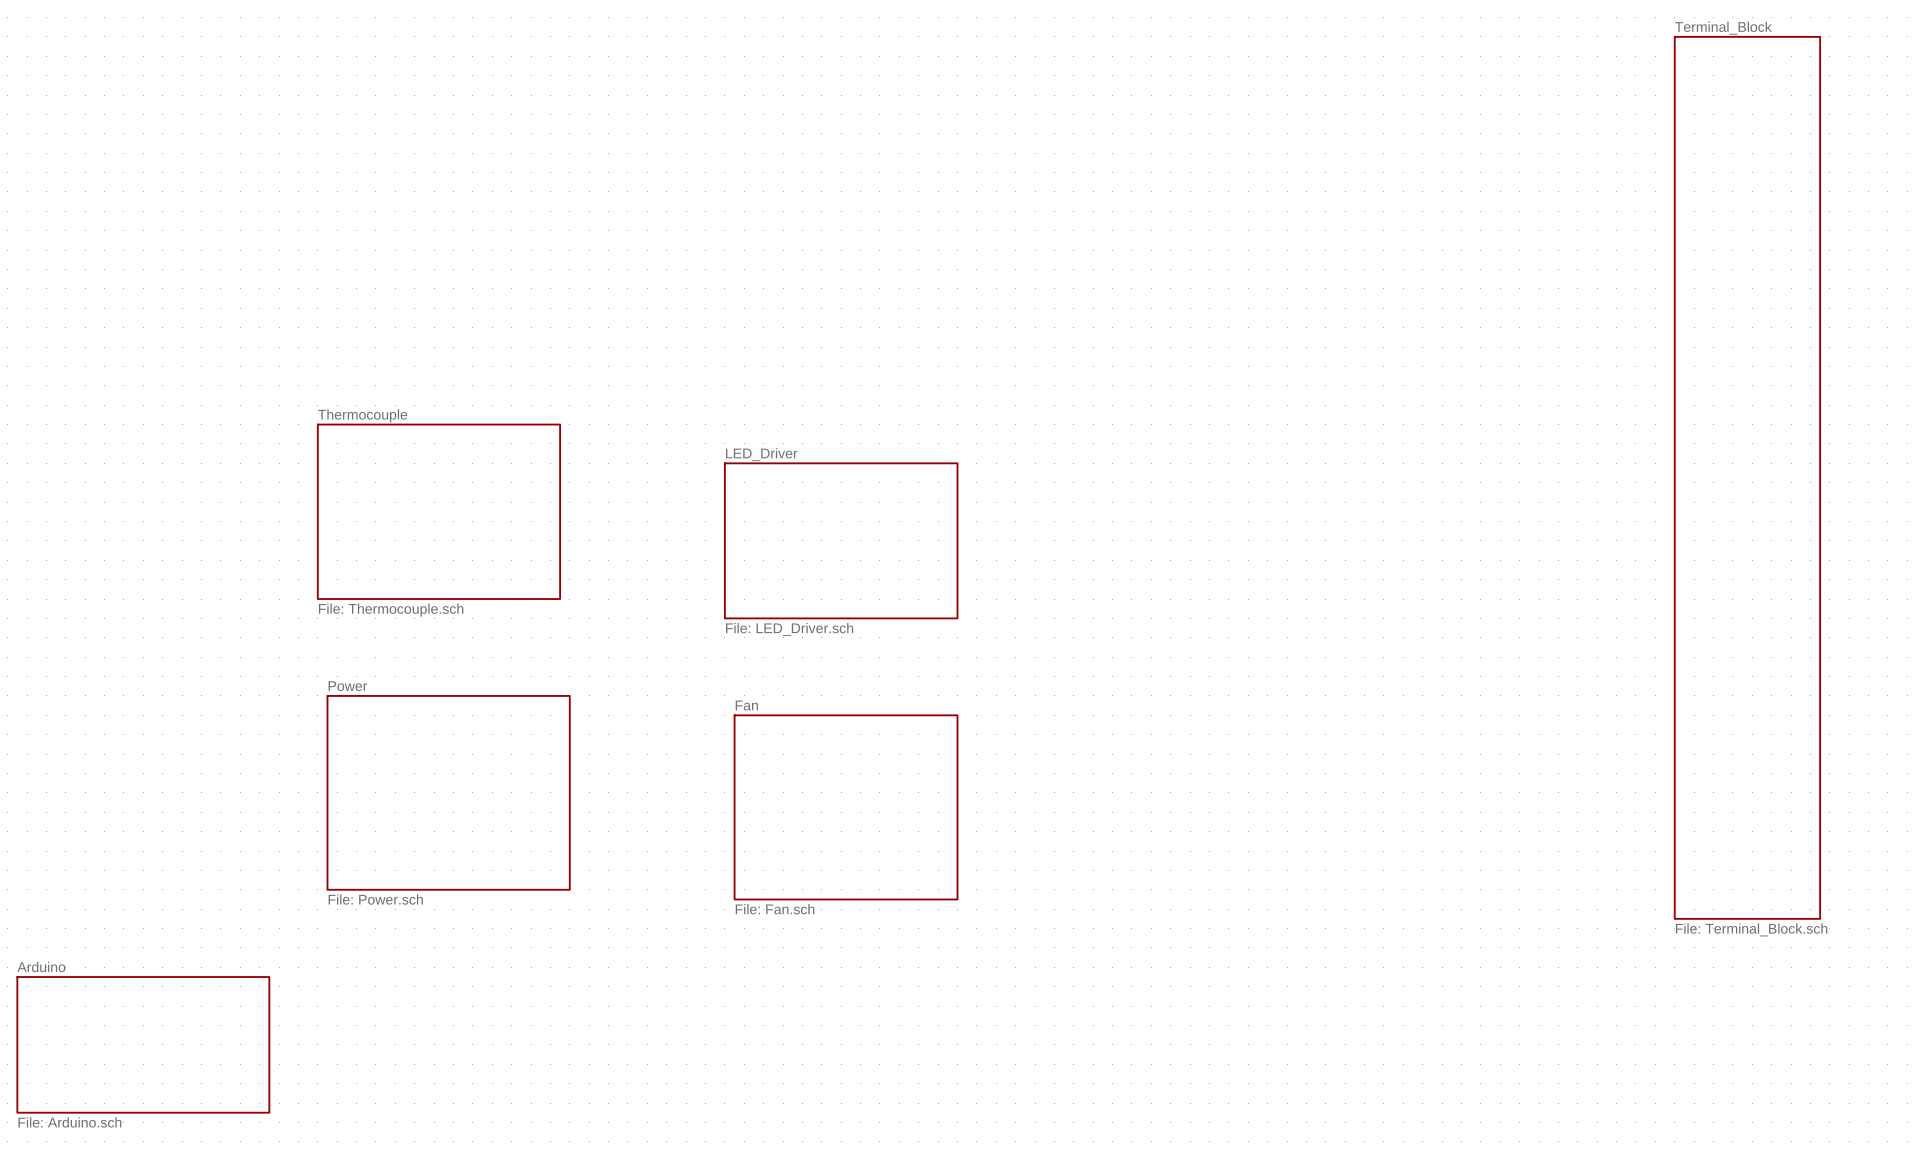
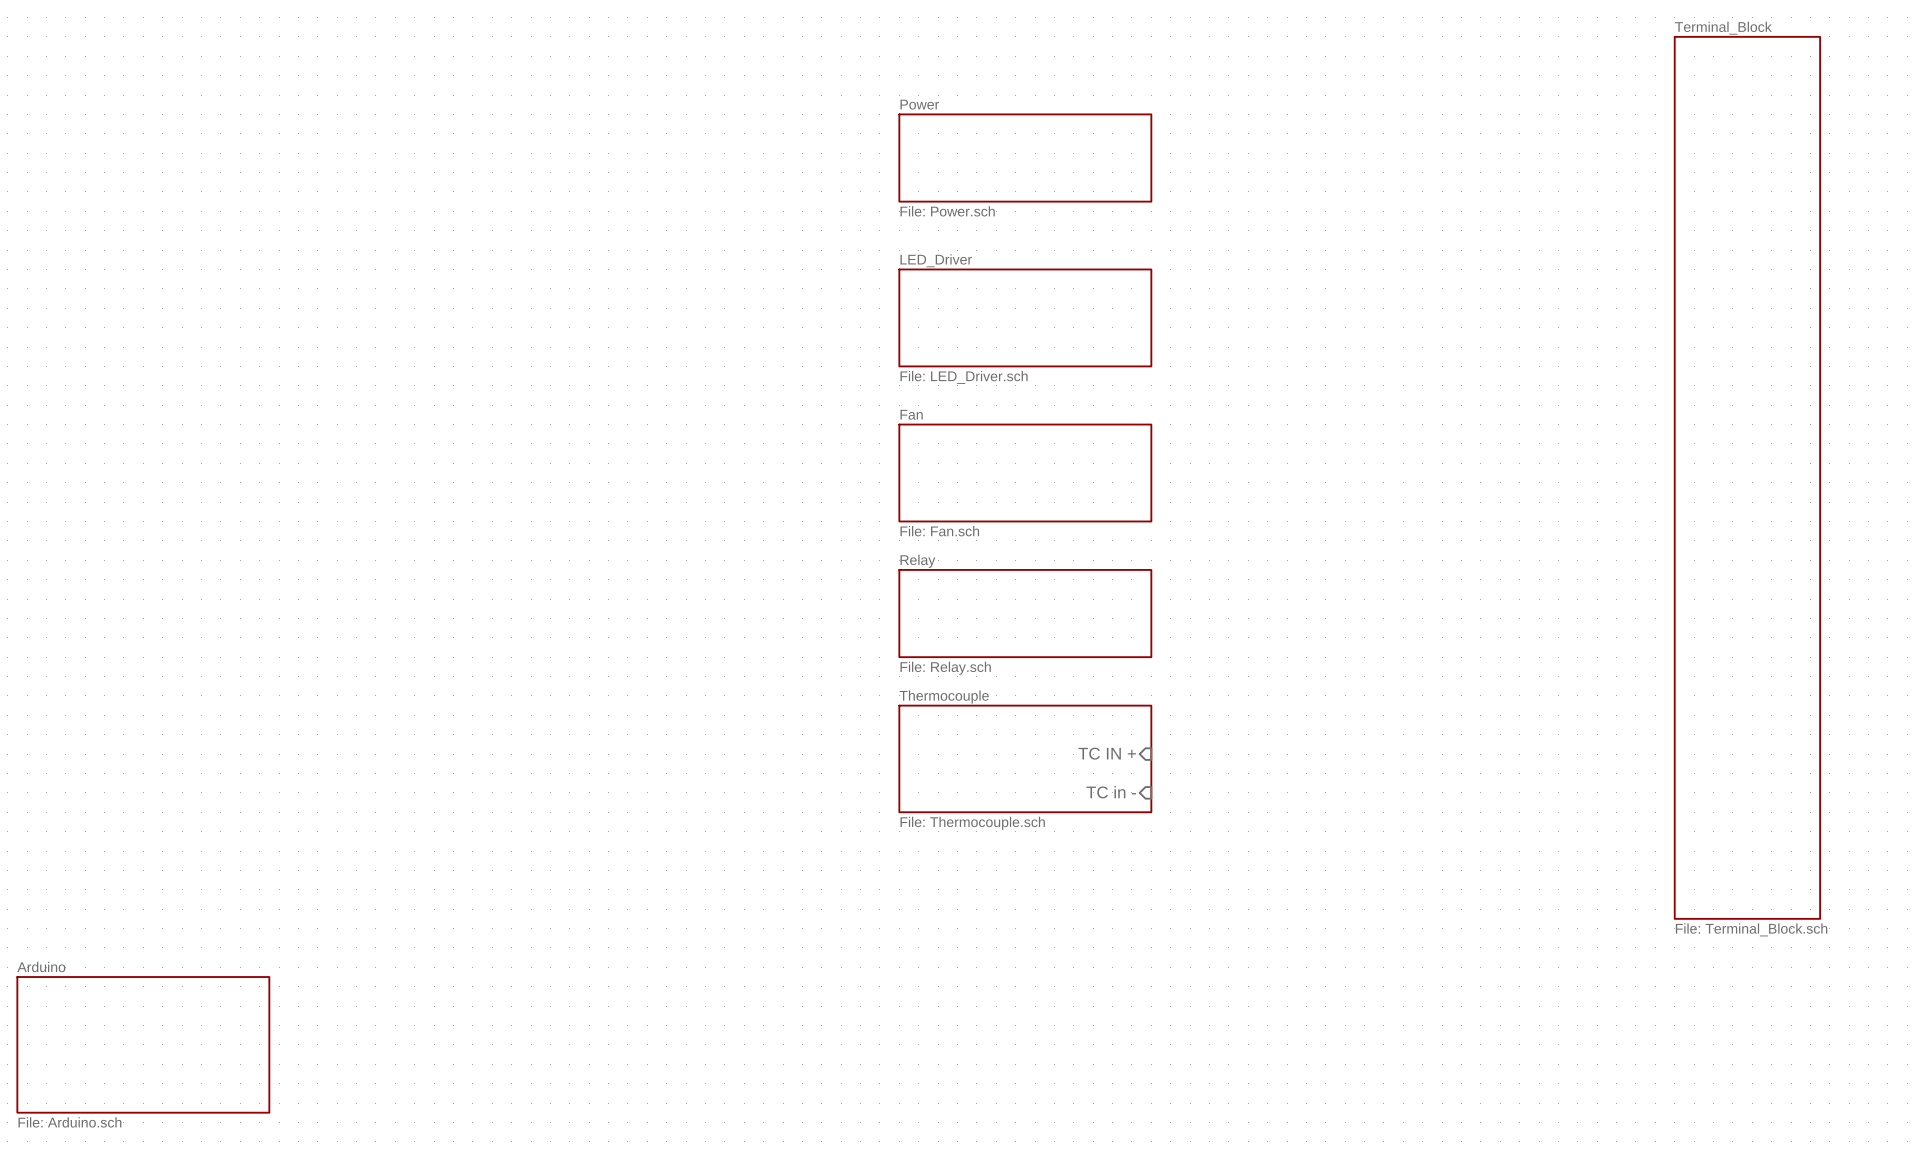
sheet Power: none -> File: Power.sch (1025, 158)
sheet LED_Driver: none -> File: LED_Driver.sch (1025, 317)
sheet Fan: none -> File: Fan.sch (1025, 473)
sheet Thermocouple: File: Thermocouple.sch (438, 511) -> none
sheet LED_Driver: File: LED_Driver.sch (841, 540) -> none
sheet Relay: none -> File: Relay.sch (1025, 613)
sheet pin: none -> TC IN + (1107, 753)
sheet Thermocouple: none -> File: Thermocouple.sch (1025, 758)
sheet Power: File: Power.sch (448, 792) -> none
sheet pin: none -> TC in - (1111, 792)
sheet Fan: File: Fan.sch (846, 807) -> none

